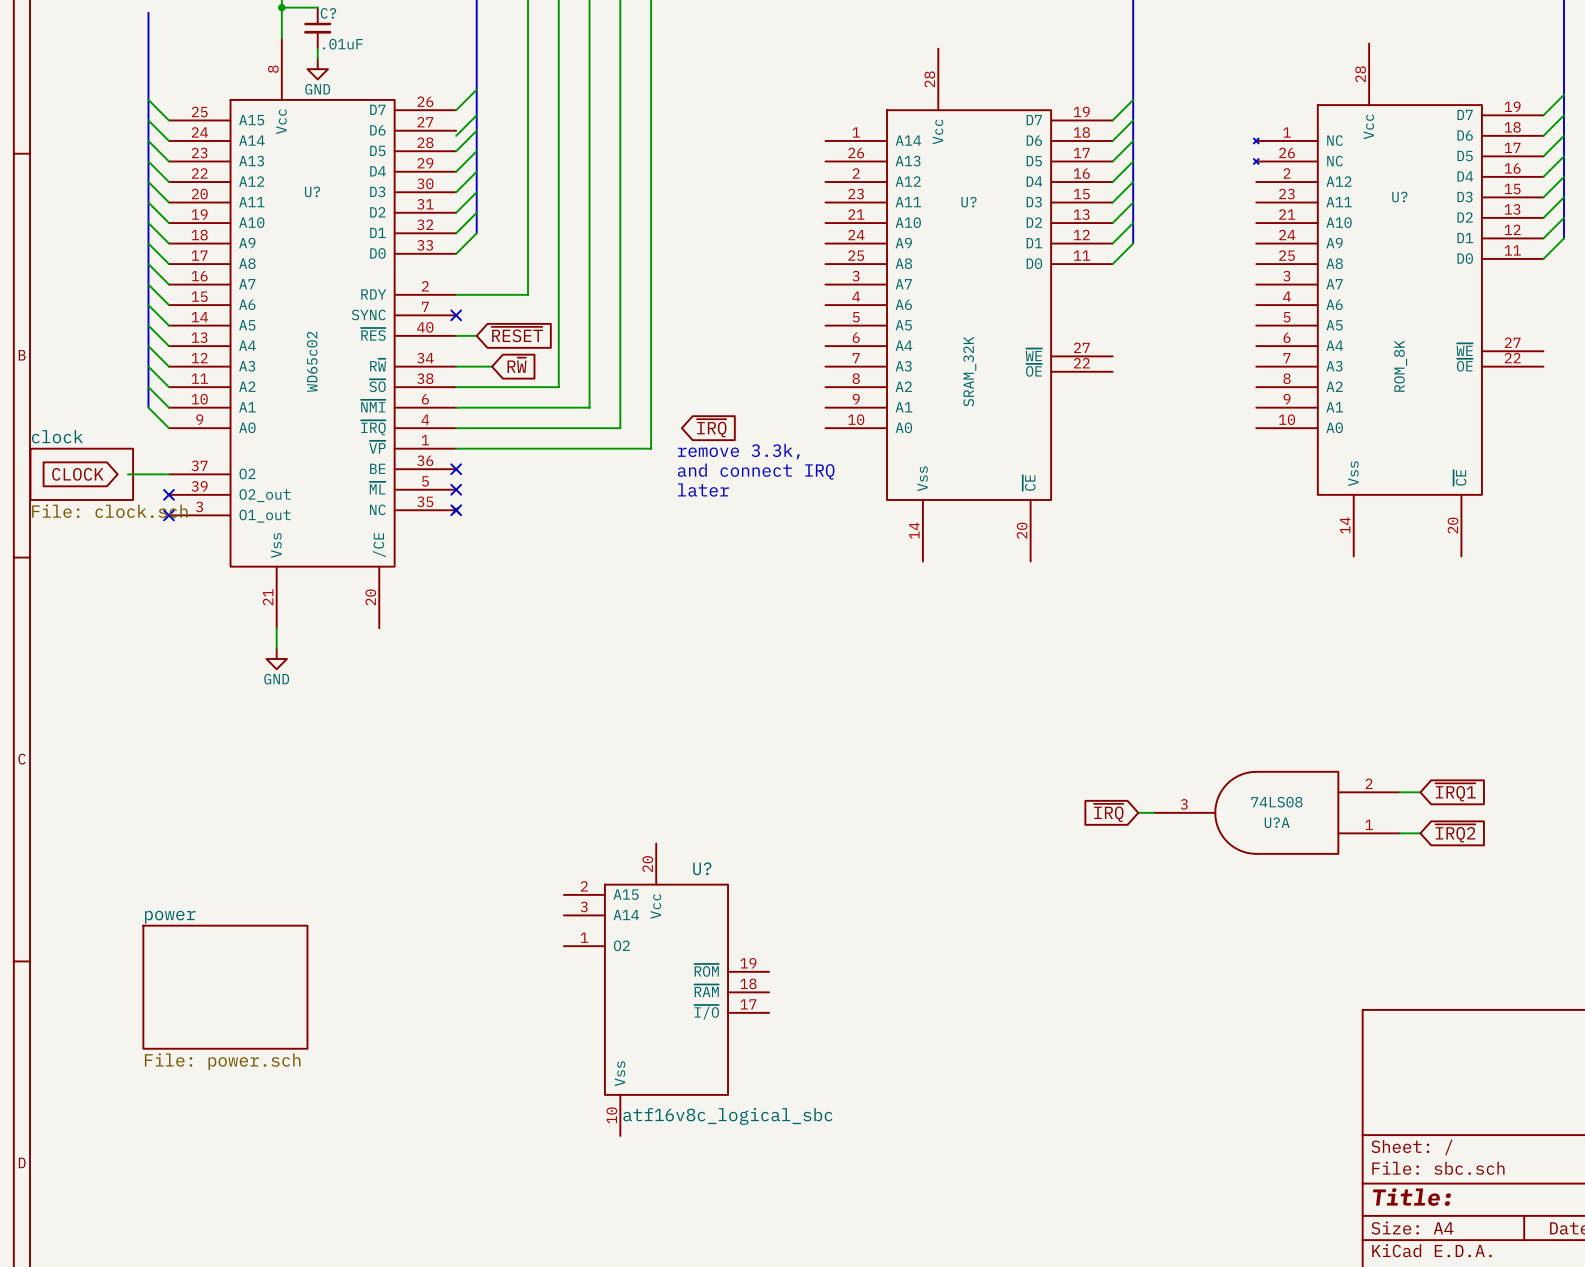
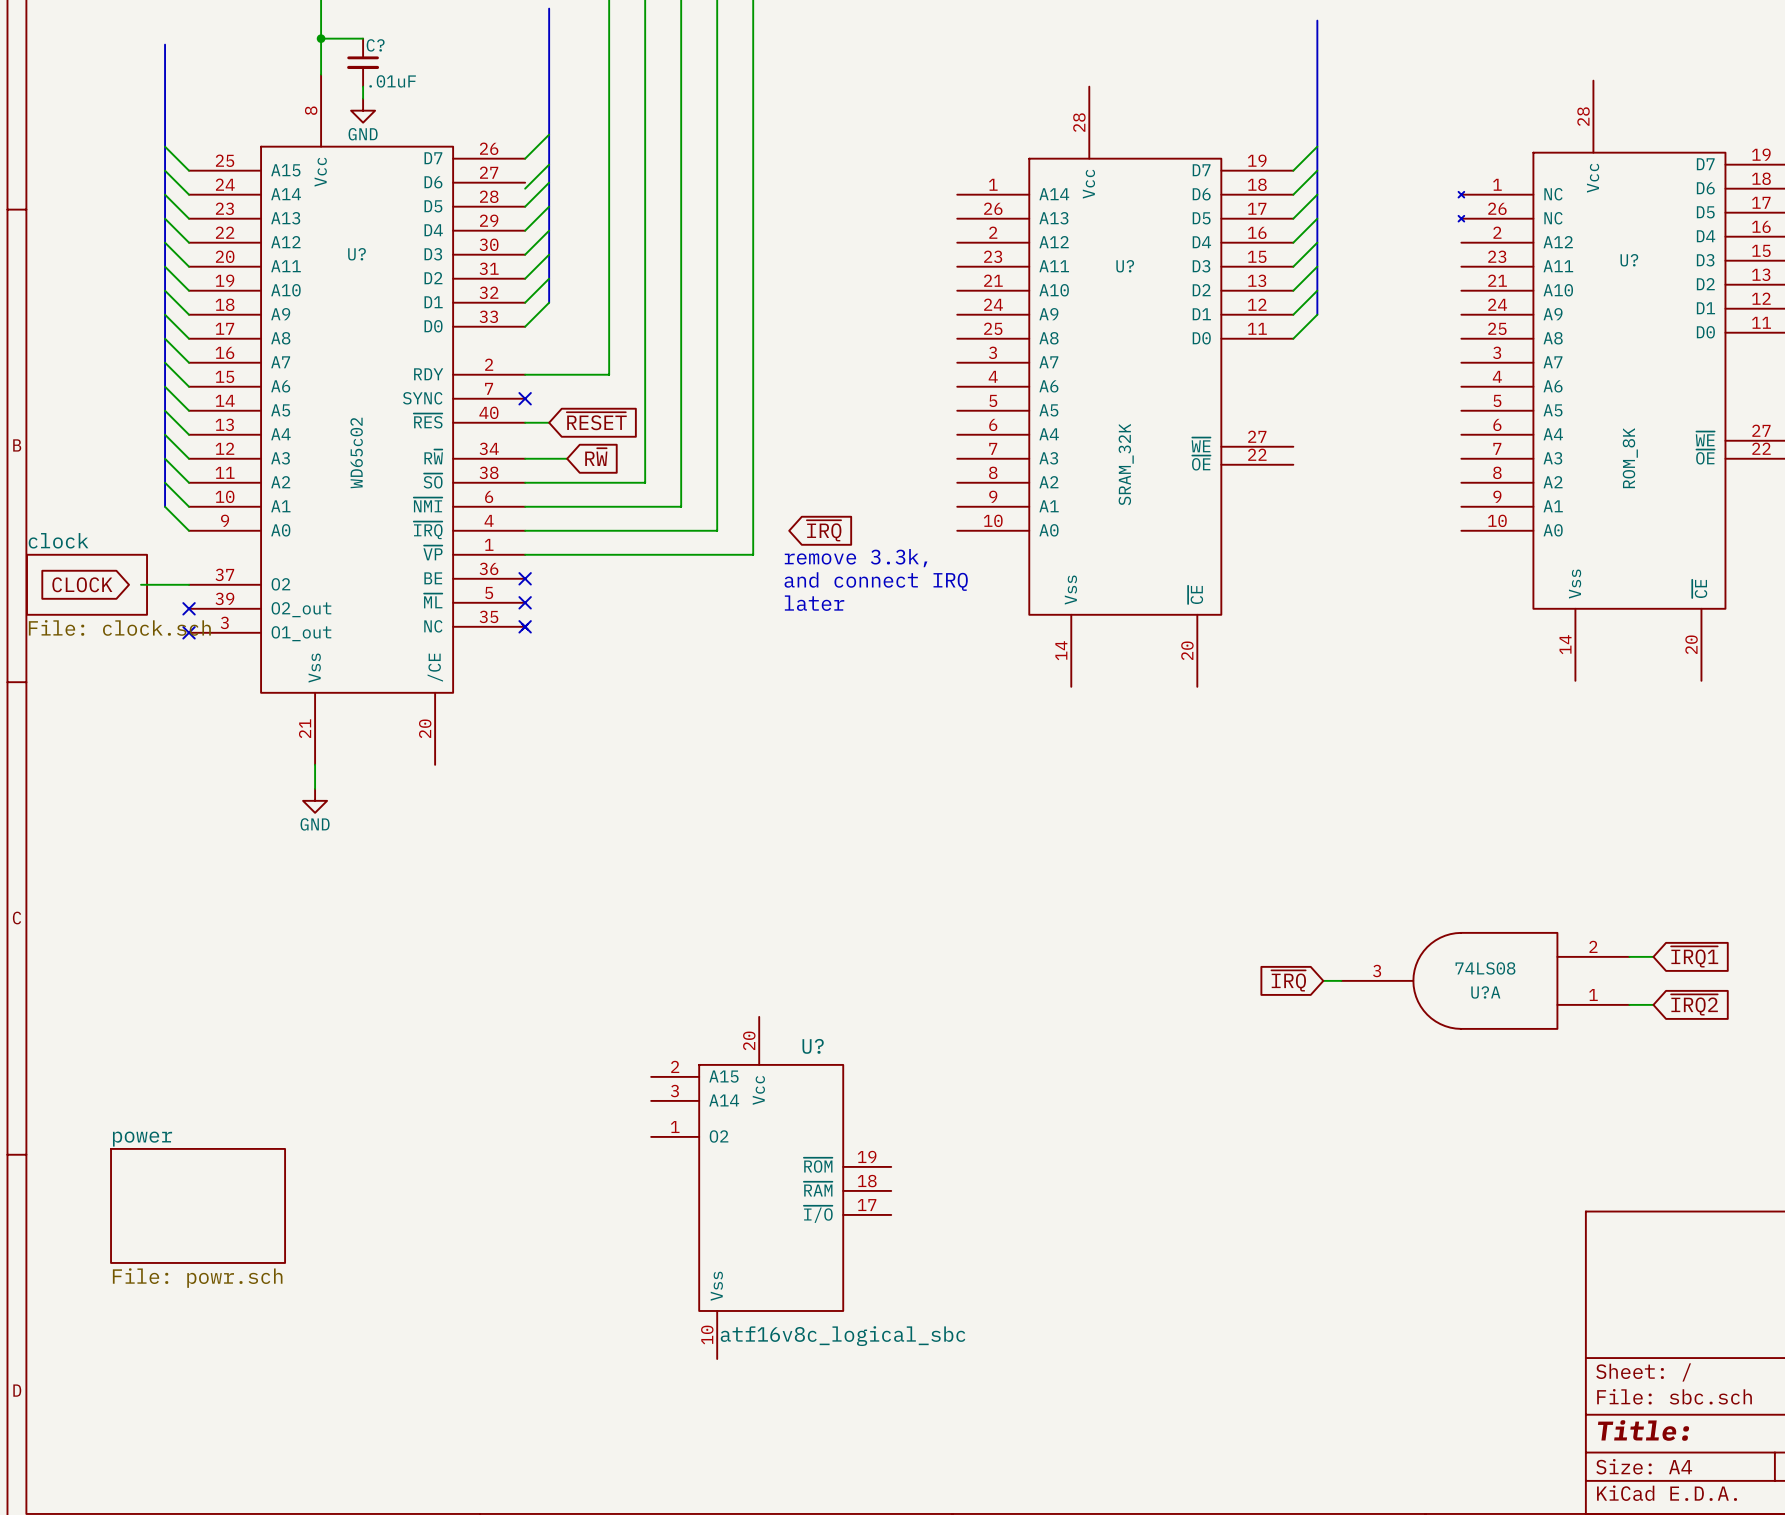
sheet power: File: power.sch (225, 987) -> none
sheet power: none -> File: powr.sch (198, 1205)

